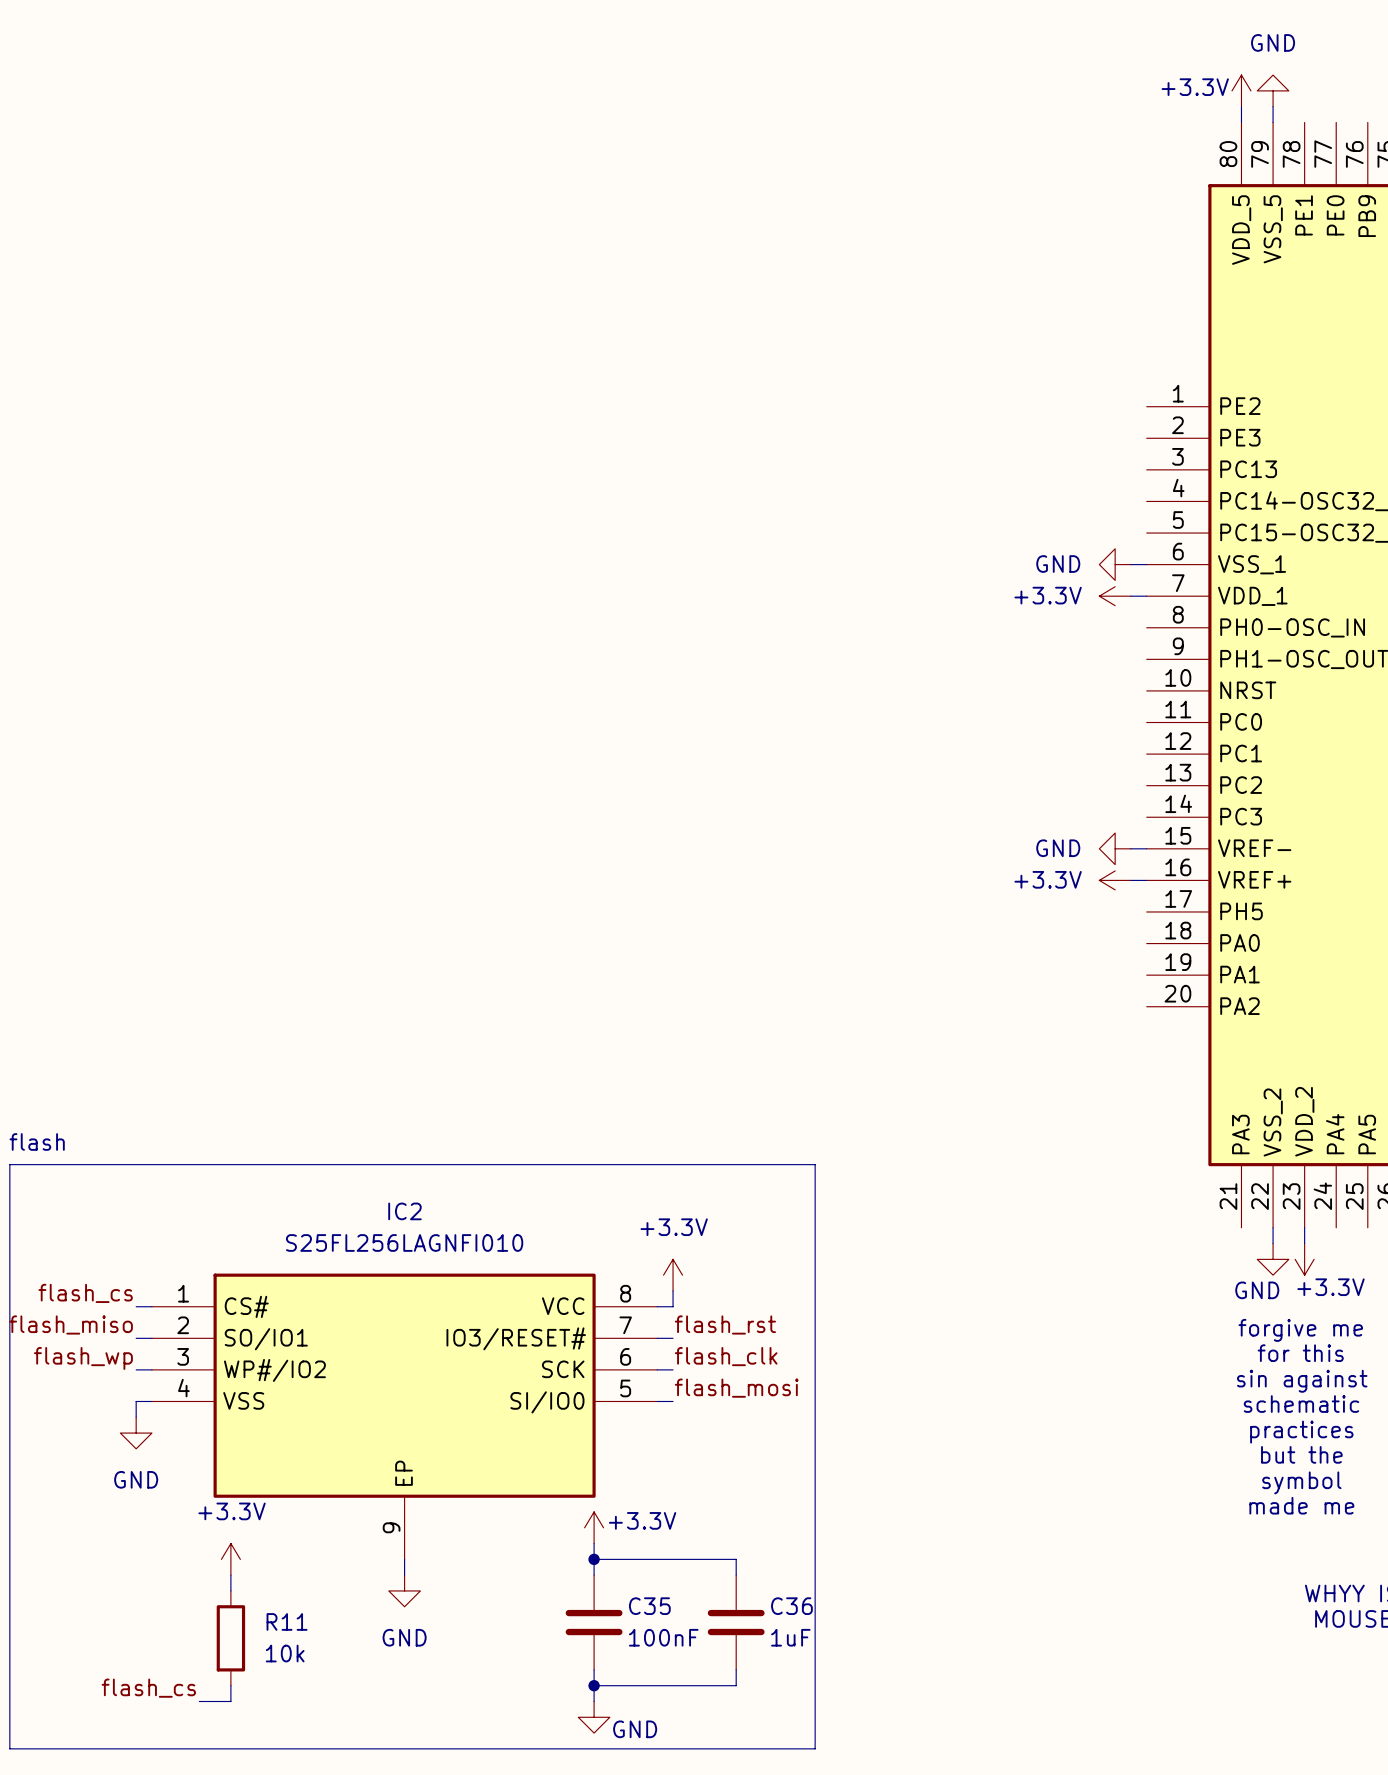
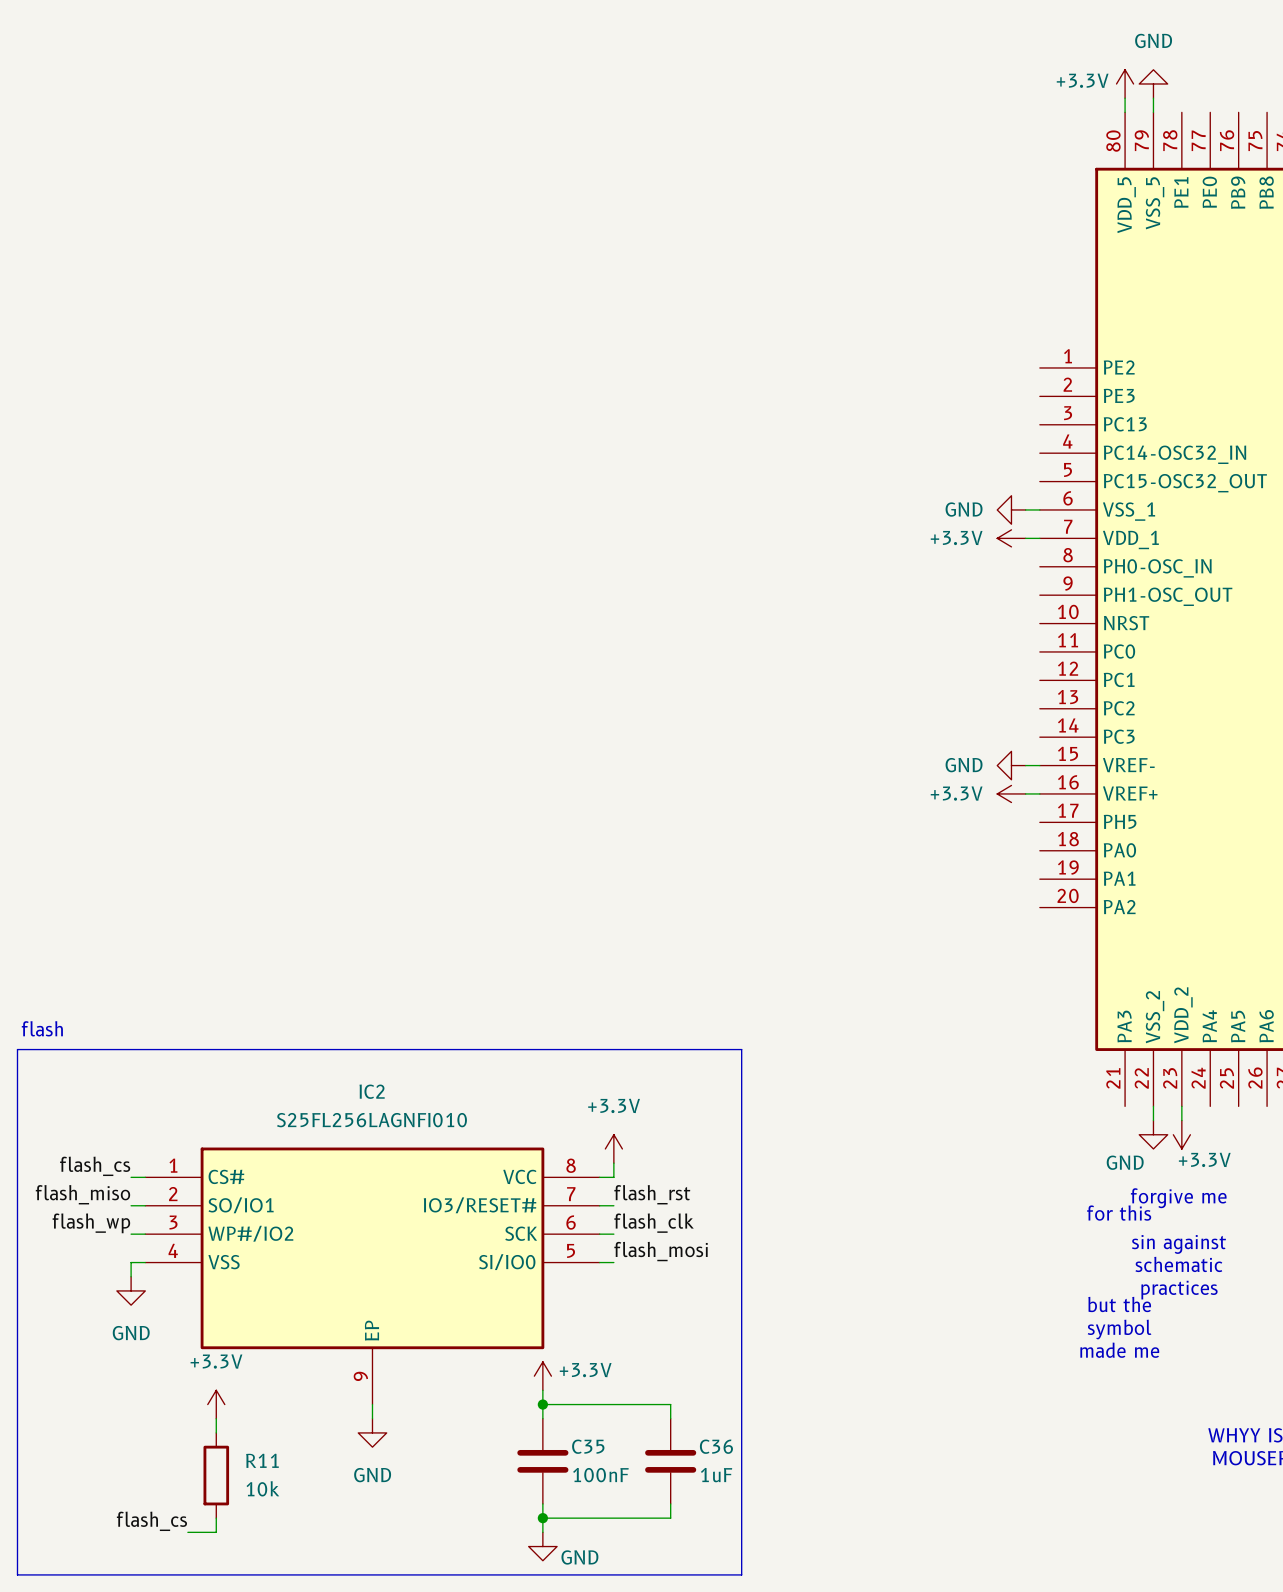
power symbol text position: GND (1257, 1290) -> GND (1125, 1162)
text position: for this (1300, 1353) -> for this (1119, 1213)
text position: but the (1301, 1454) -> but the (1119, 1304)
text position: symbol (1301, 1482) -> symbol (1119, 1329)
text position: made me (1301, 1505) -> made me (1119, 1350)

